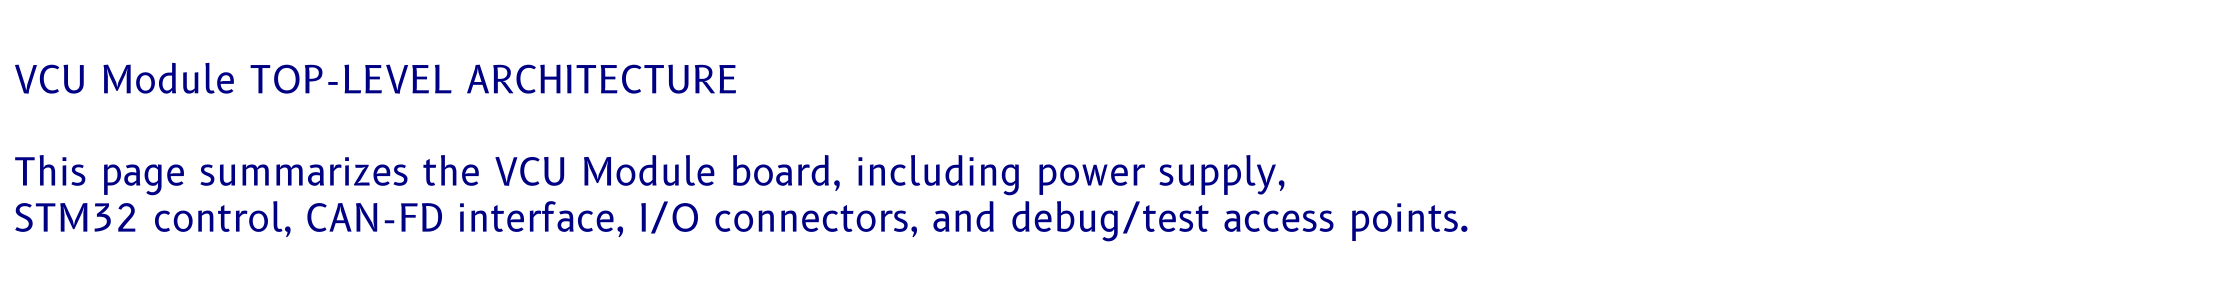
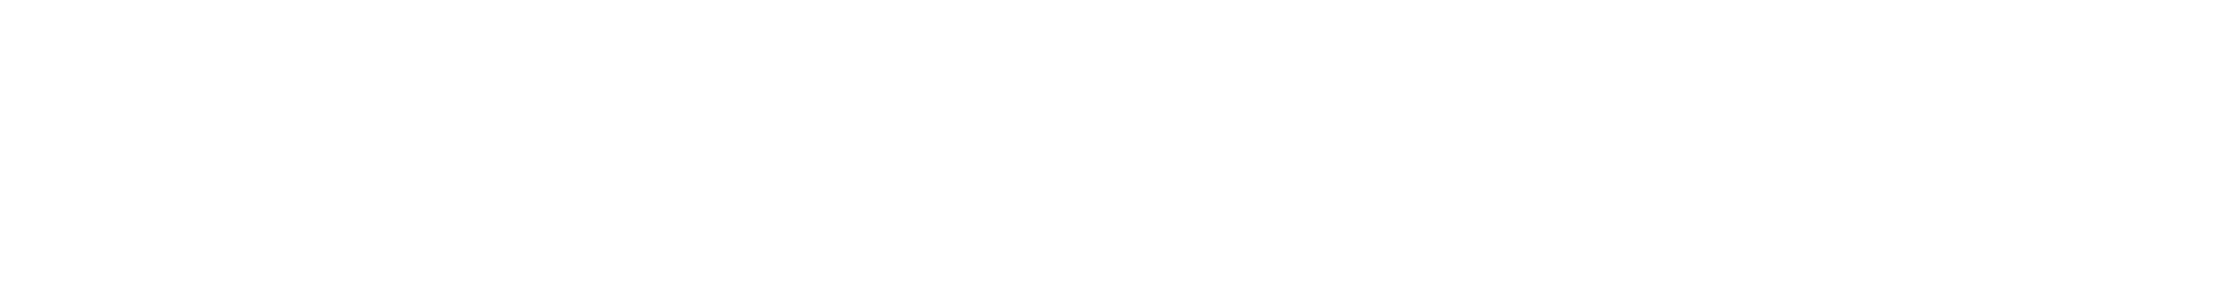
text: VCU Module TOP-LEVEL ARCHITECTURE (375, 78) -> none
text: This page summarizes the VCU Module board, including power supply, (649, 175) -> none
text: STM32 control, CAN-FD interface, I/O connectors, and debug/test access points. (741, 221) -> none

